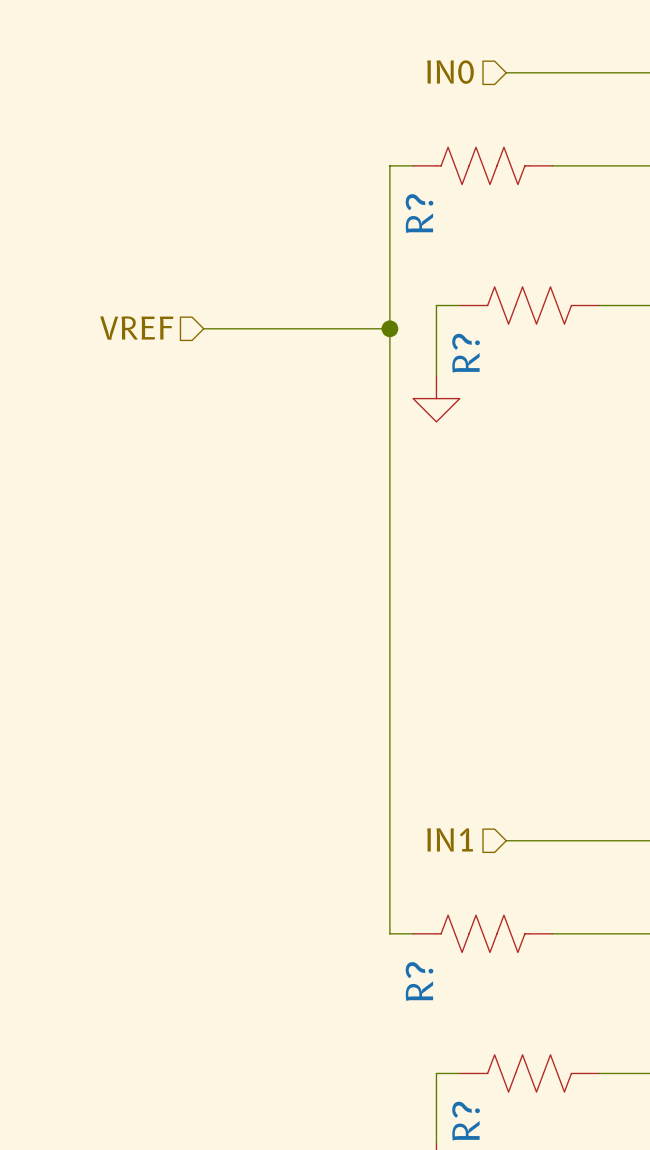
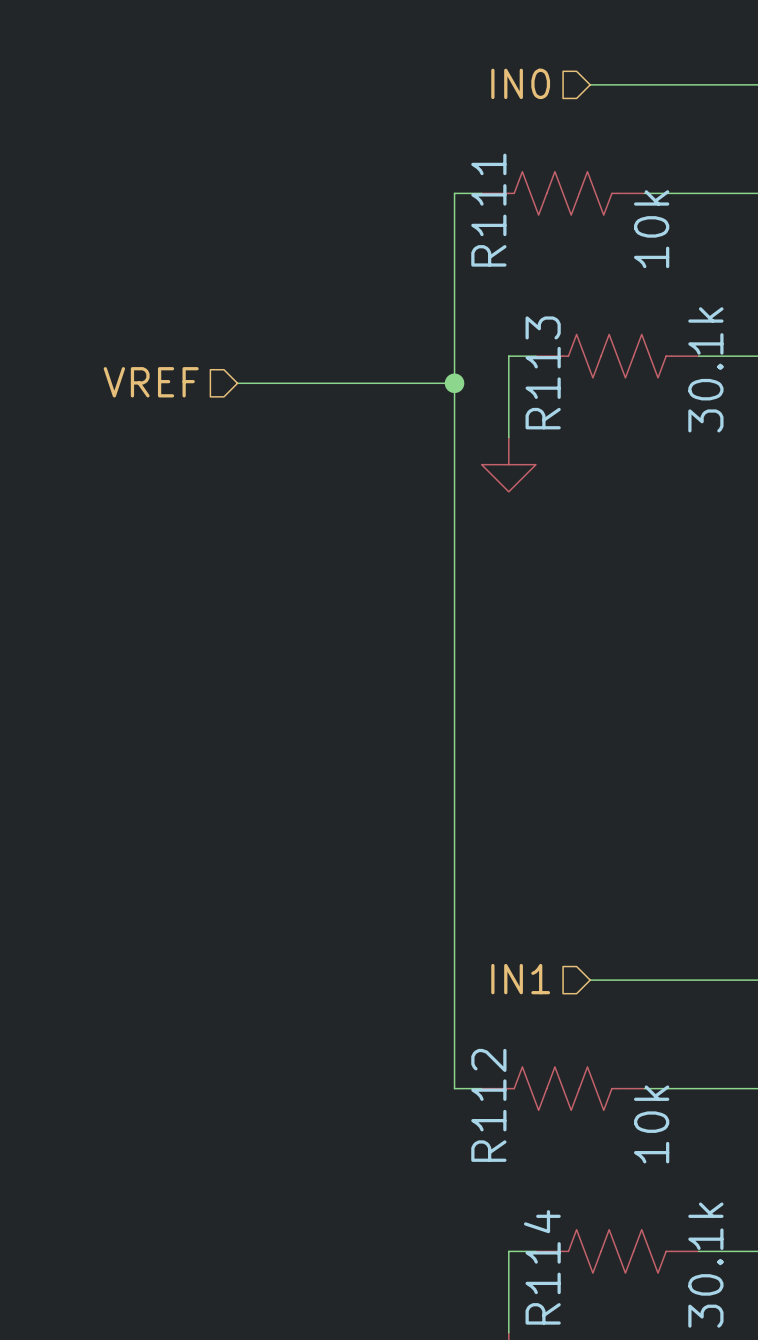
R? value: none -> 10k (651, 229)
R? name: R? (419, 213) -> R111 (488, 210)
R? value: none -> 30.1k (705, 369)
R? name: R? (466, 353) -> R113 (543, 372)
R? value: none -> 10k (651, 1124)
R? name: R? (419, 981) -> R112 (488, 1105)
R? value: none -> 30.1k (705, 1265)
R? name: R? (466, 1121) -> R114 (542, 1267)

